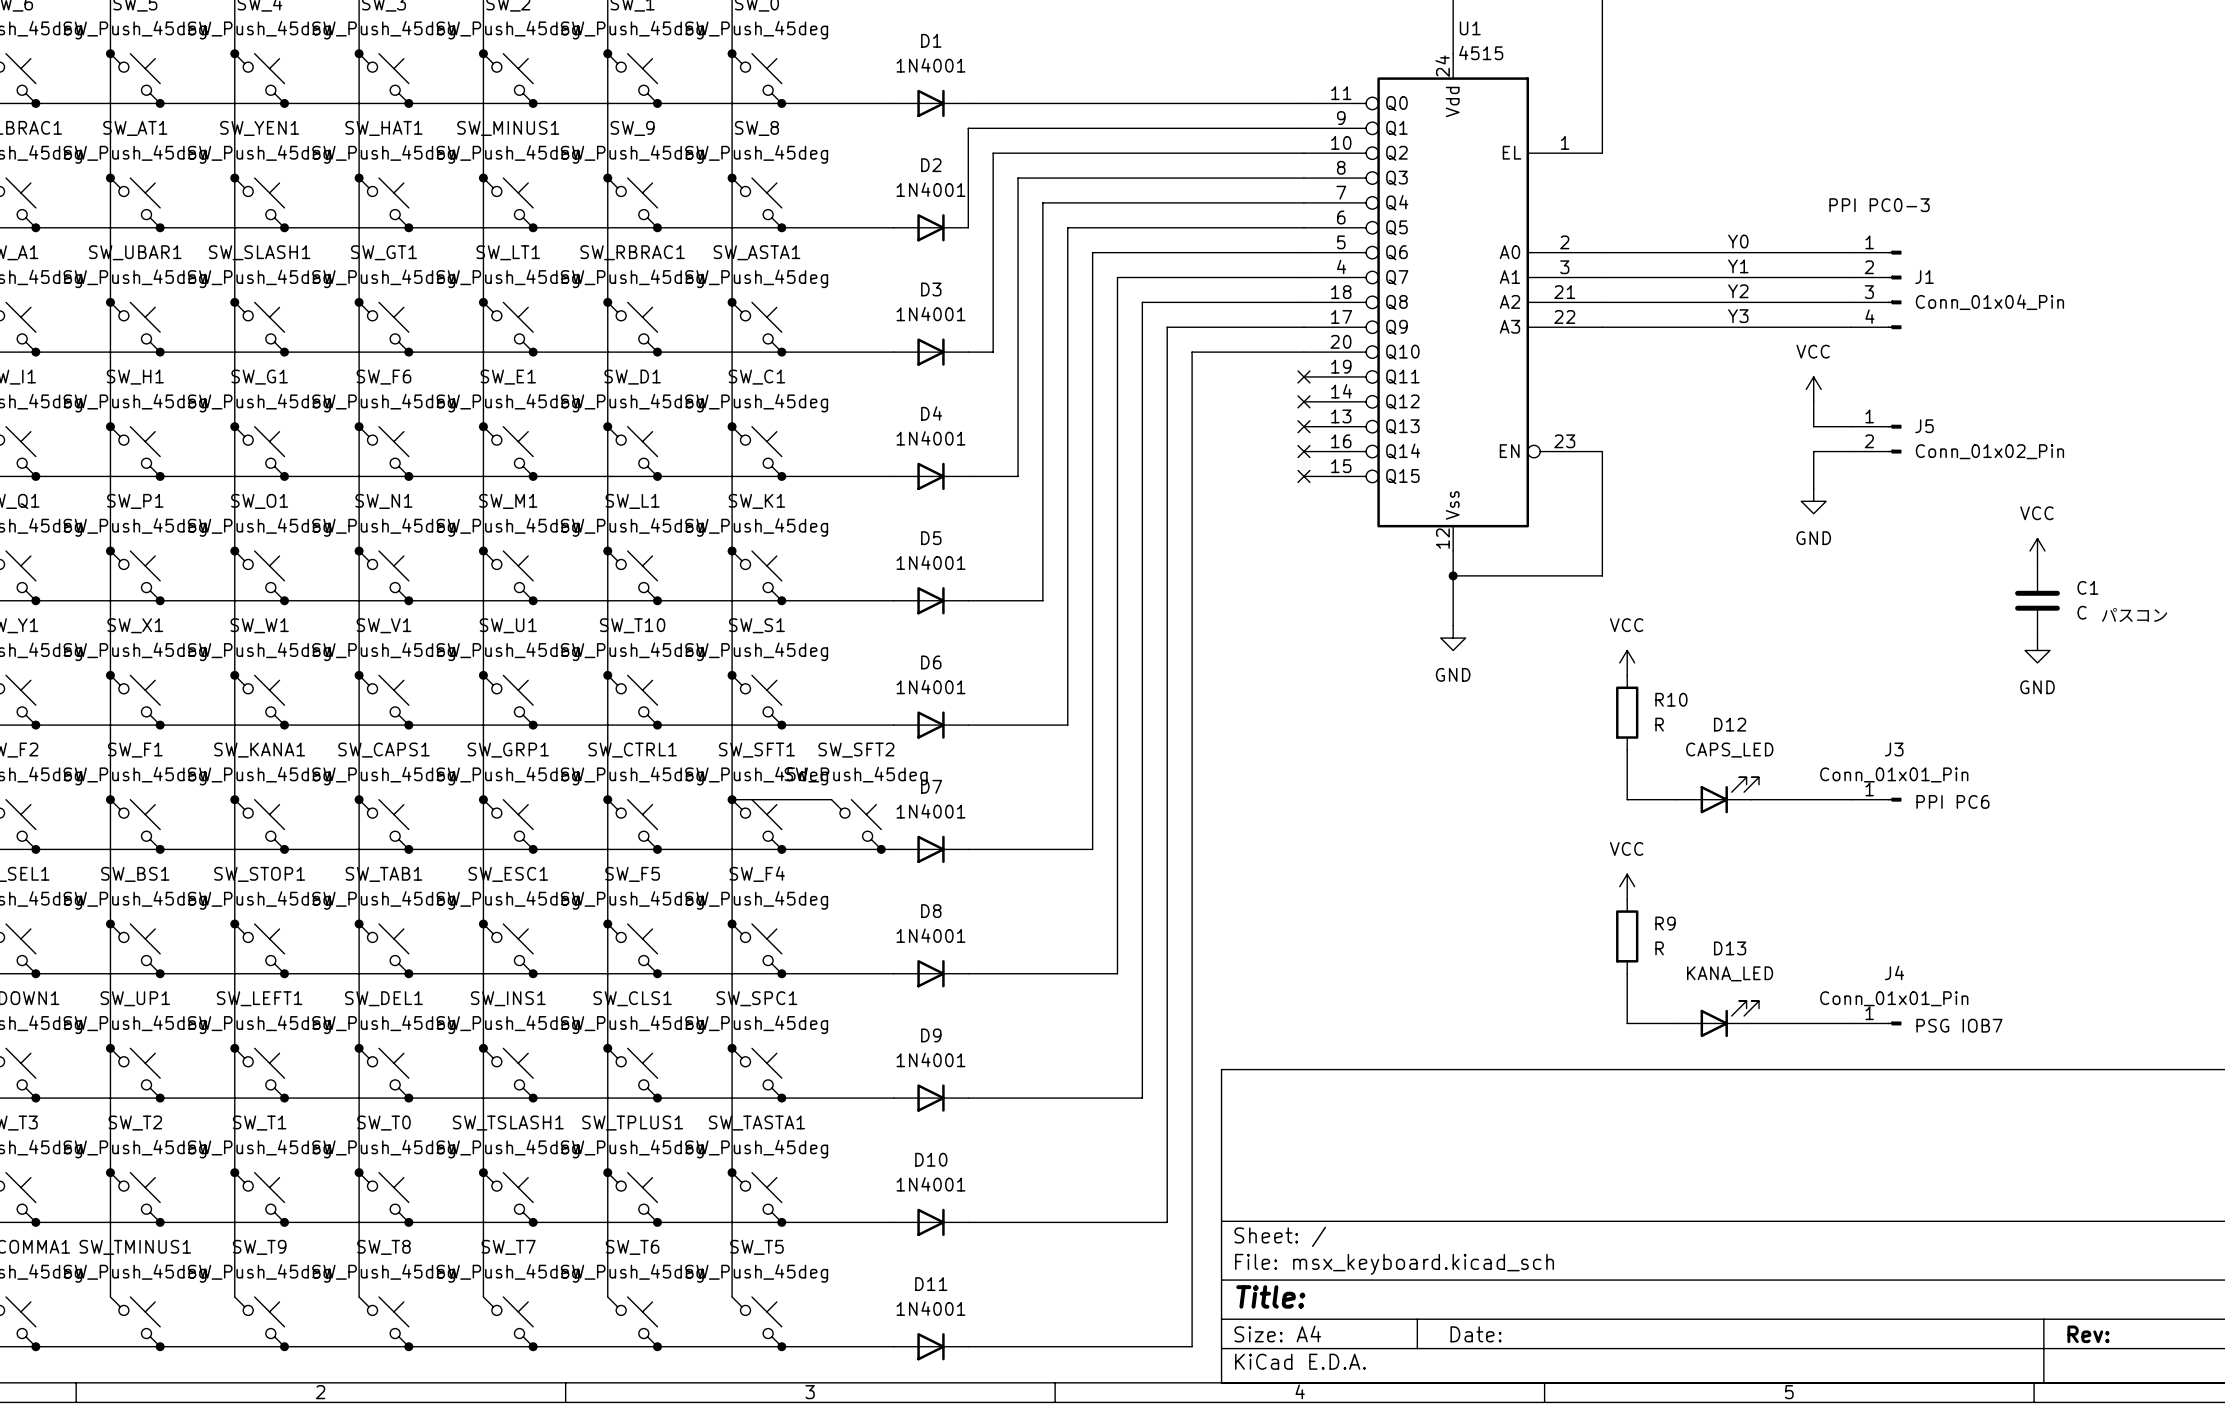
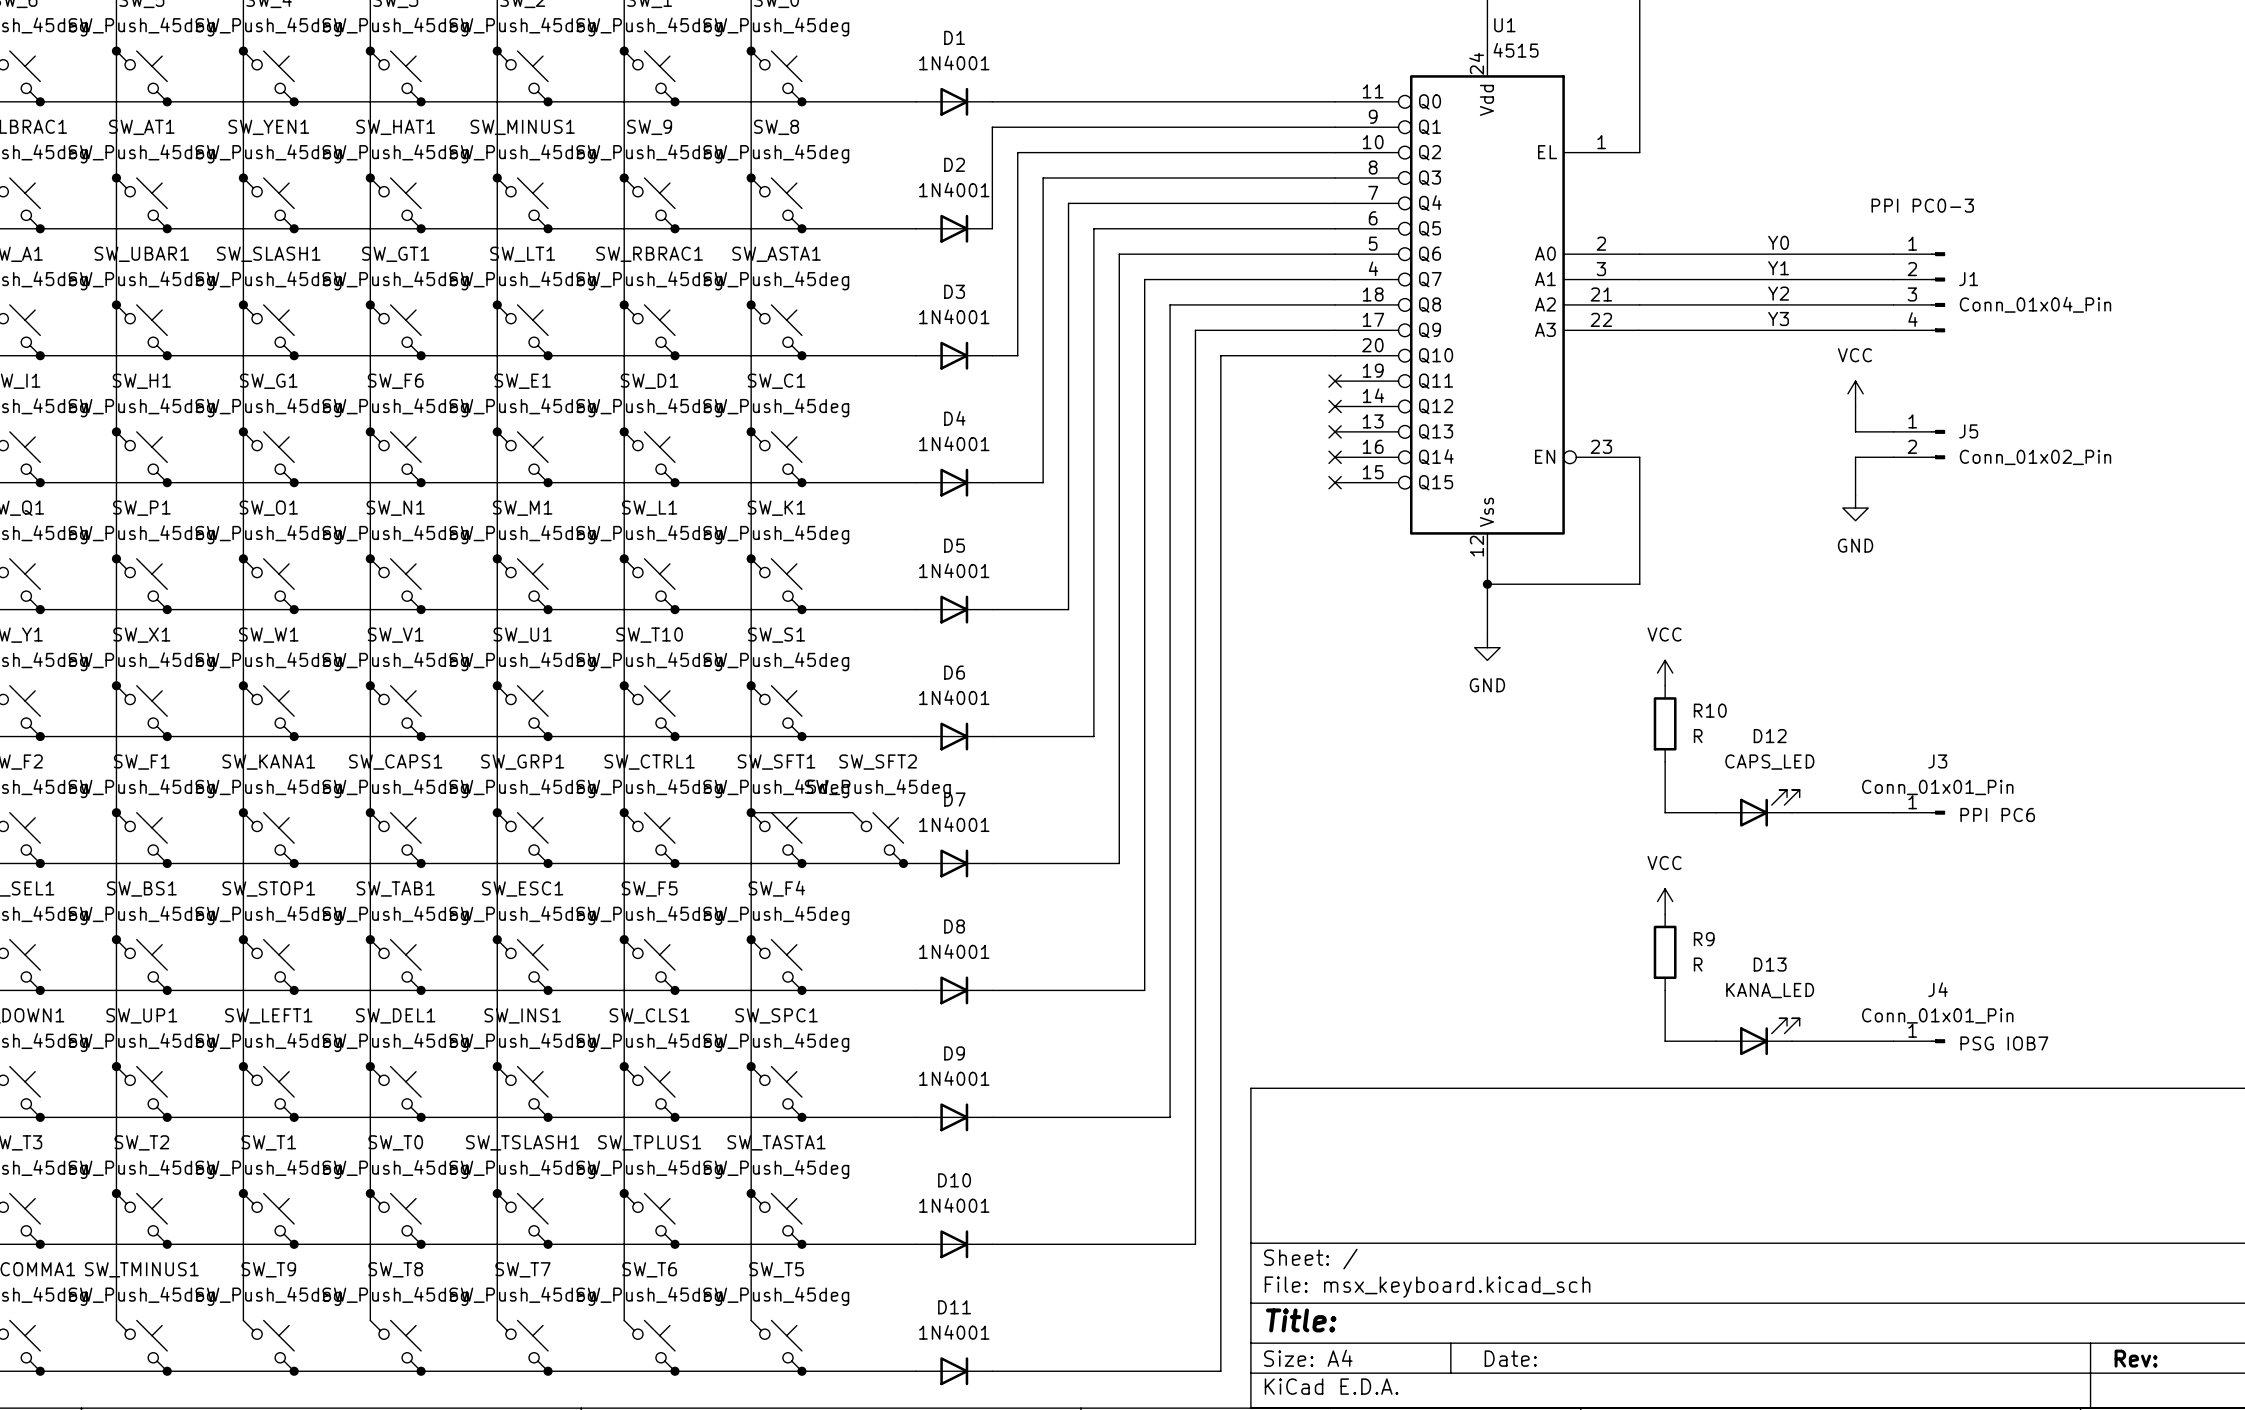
power symbol: VCC (2037, 551) -> none
C1: C (2037, 600) -> none
text: パスコン (2134, 615) -> none
power symbol: GND (2037, 650) -> none

